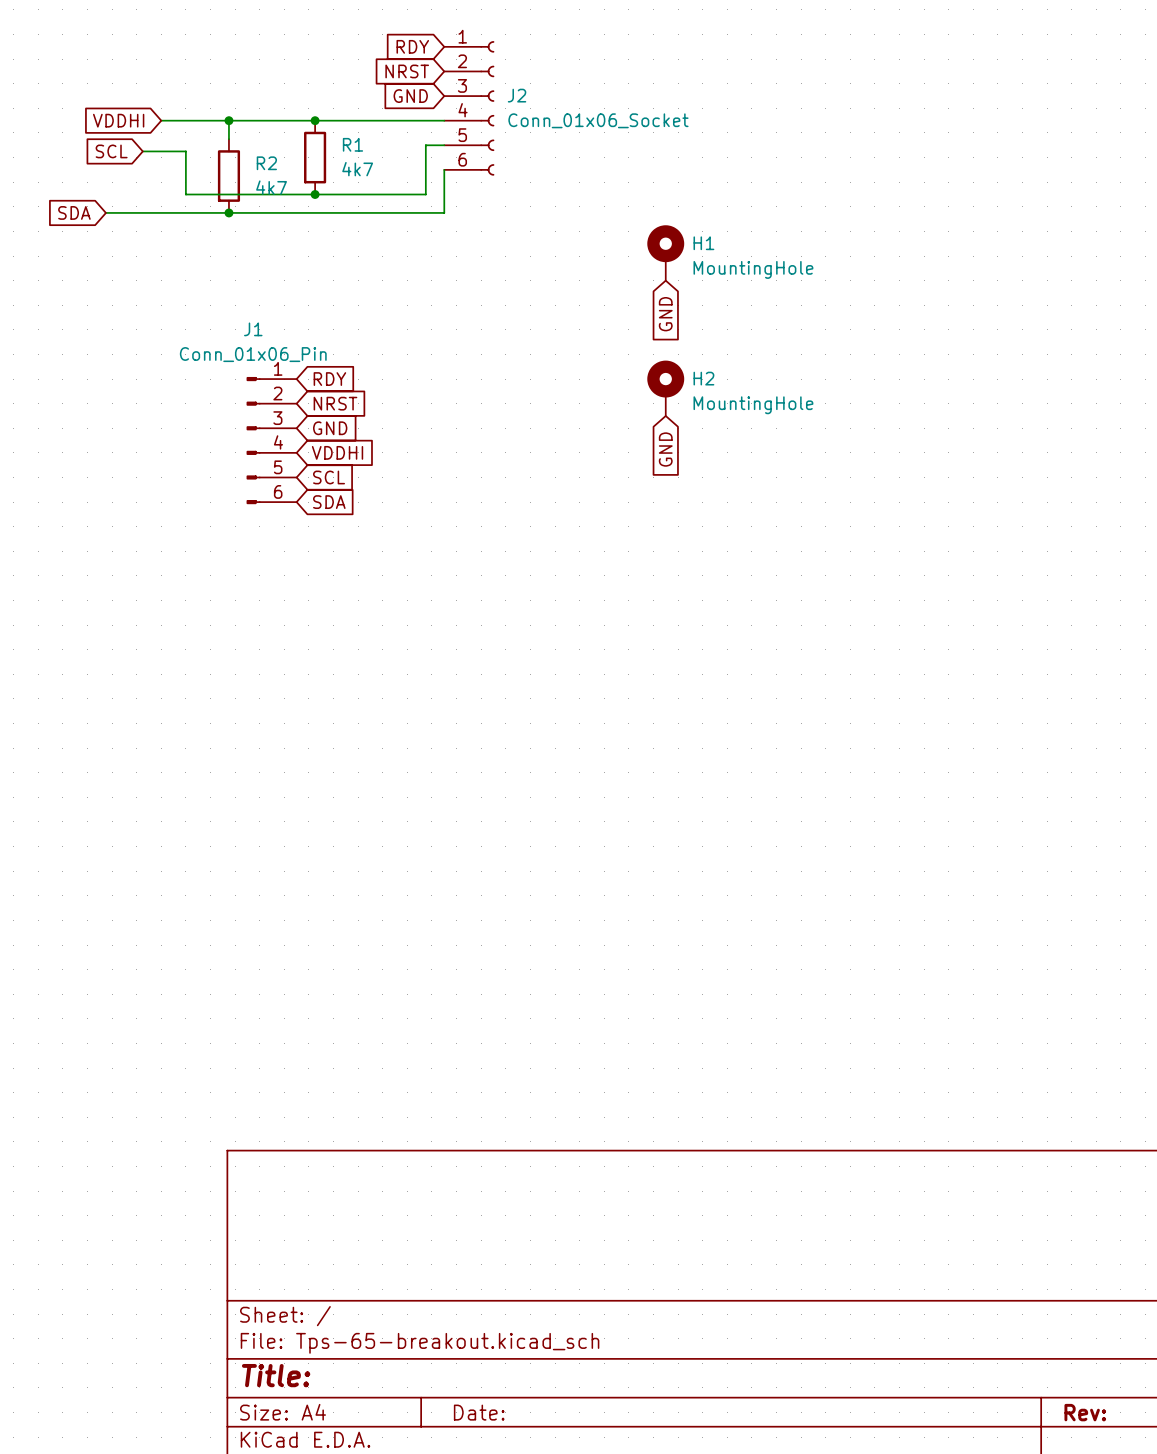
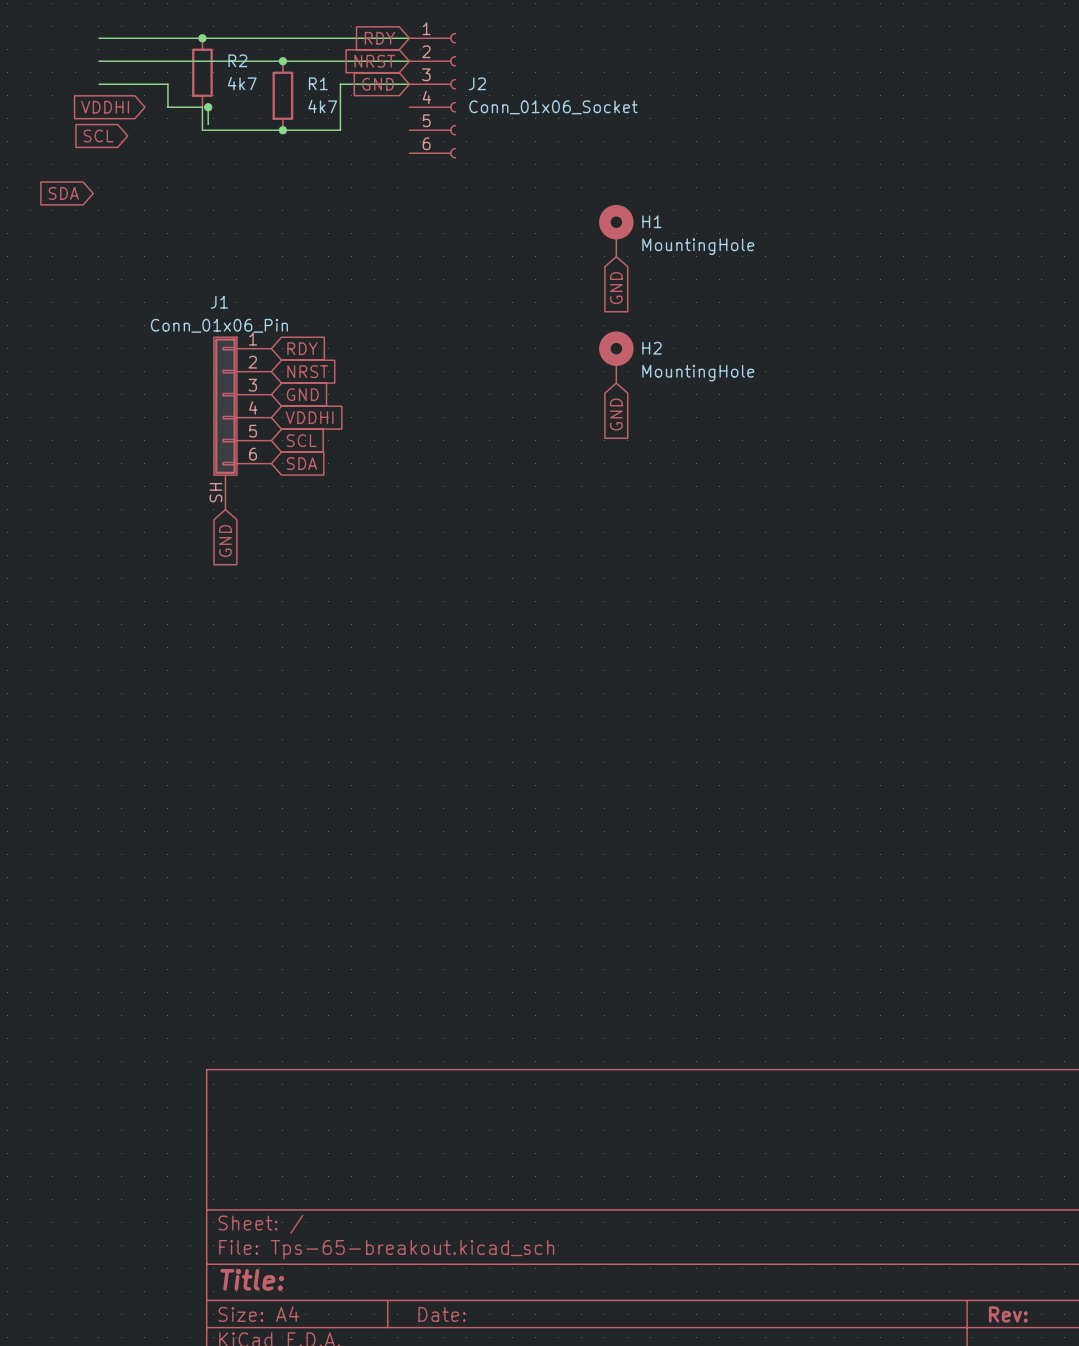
wire: none -> (98, 38) (409, 38)
junction: none -> (202, 38)
wire: none -> (98, 61) (409, 61)
junction: none -> (282, 61)
wire: (161, 120) (185, 120) -> (98, 84) (167, 84) (167, 107)
wire: (222, 120) (444, 120) -> (202, 107) (202, 130) (340, 130) (340, 84) (409, 84)
junction: (315, 120) -> none
junction: none -> (282, 130)
wire: (444, 145) (425, 145) (425, 194) (185, 194) (185, 151) (142, 151) -> none
R1 position: (315, 157) -> (282, 95)
wire: (444, 169) (444, 212) (105, 212) -> none
R2 position: (228, 176) -> (202, 72)
junction: (315, 194) -> none
junction: (228, 212) -> none
J1 symbol: [246, 377, 297, 505] -> [213, 336, 272, 510]
global label: none -> GND (225, 540)

